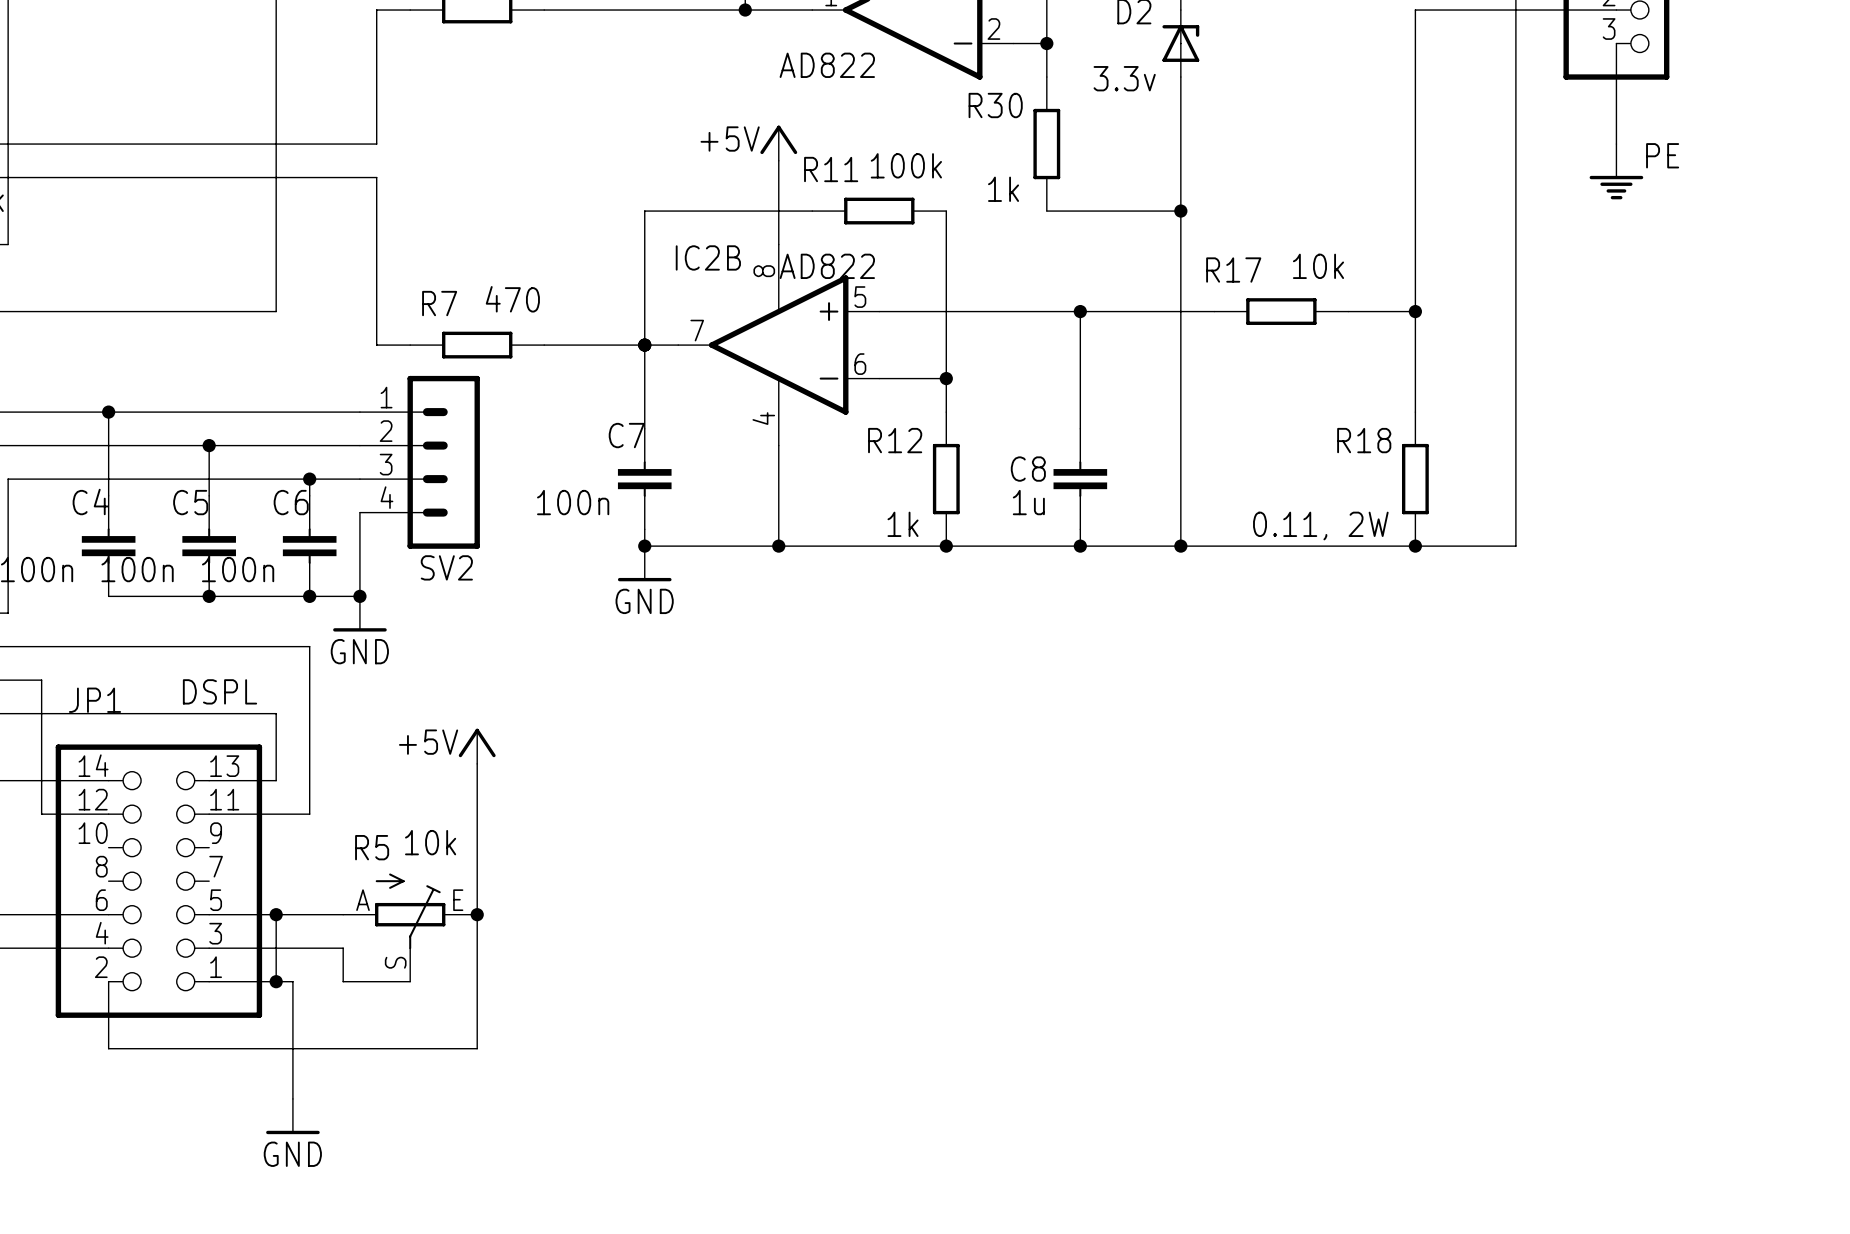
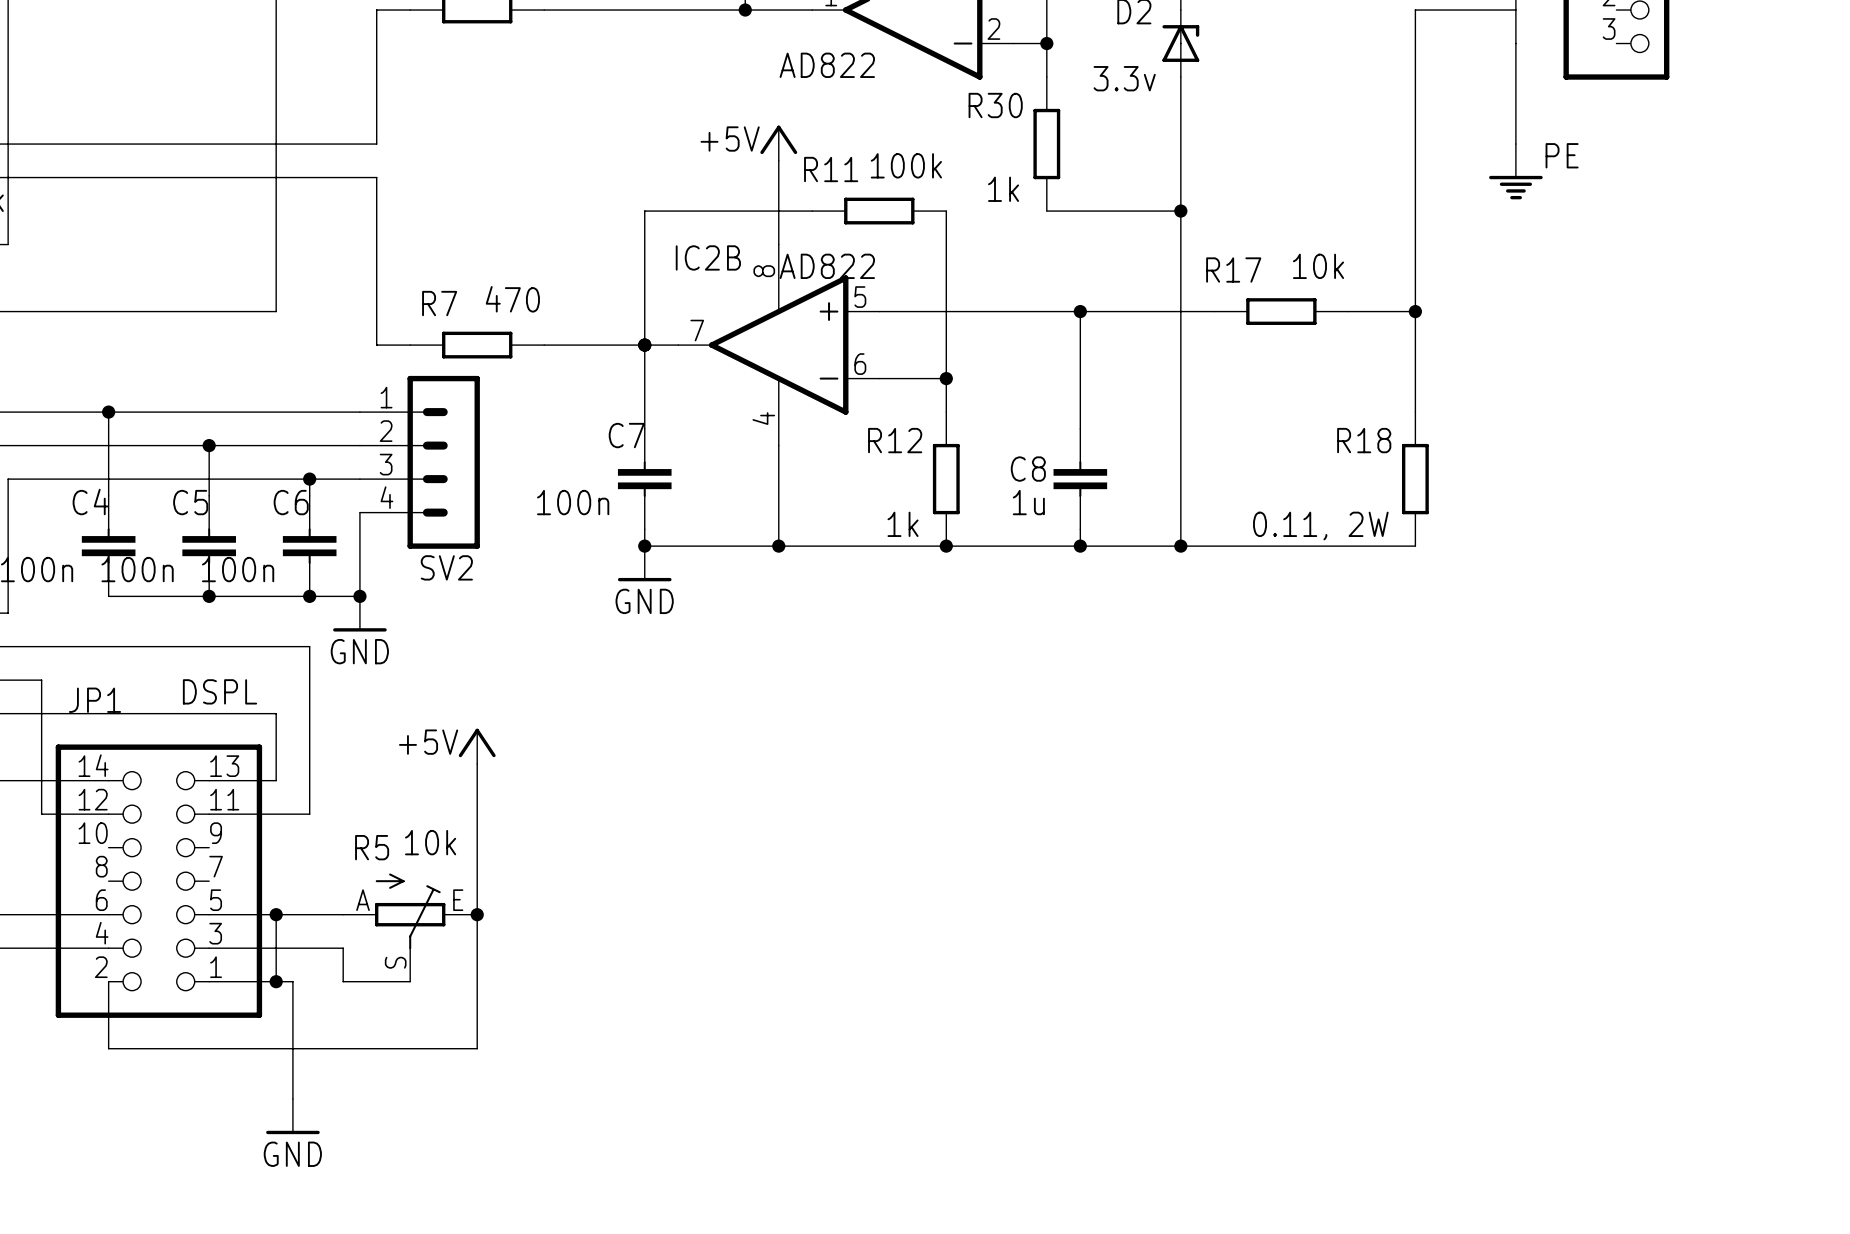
wire: (1515, 10) (1616, 10) -> none
wire: (1616, 43) (1616, 144) -> none
wire: (1515, 144) (1515, 546) (1415, 546) -> none
power symbol position: PE (1616, 171) -> PE (1515, 171)
junction: (1415, 546) -> none

